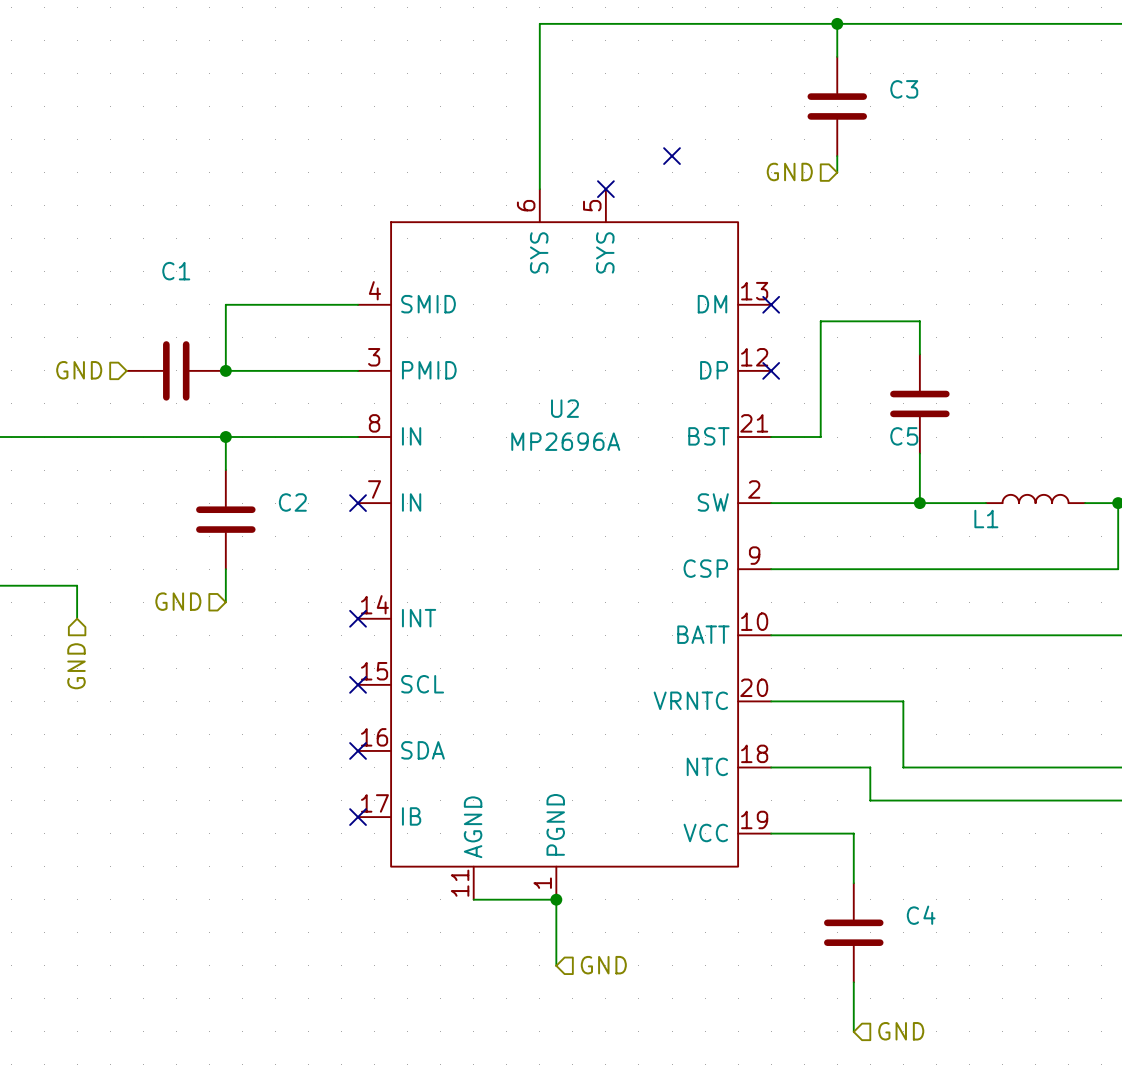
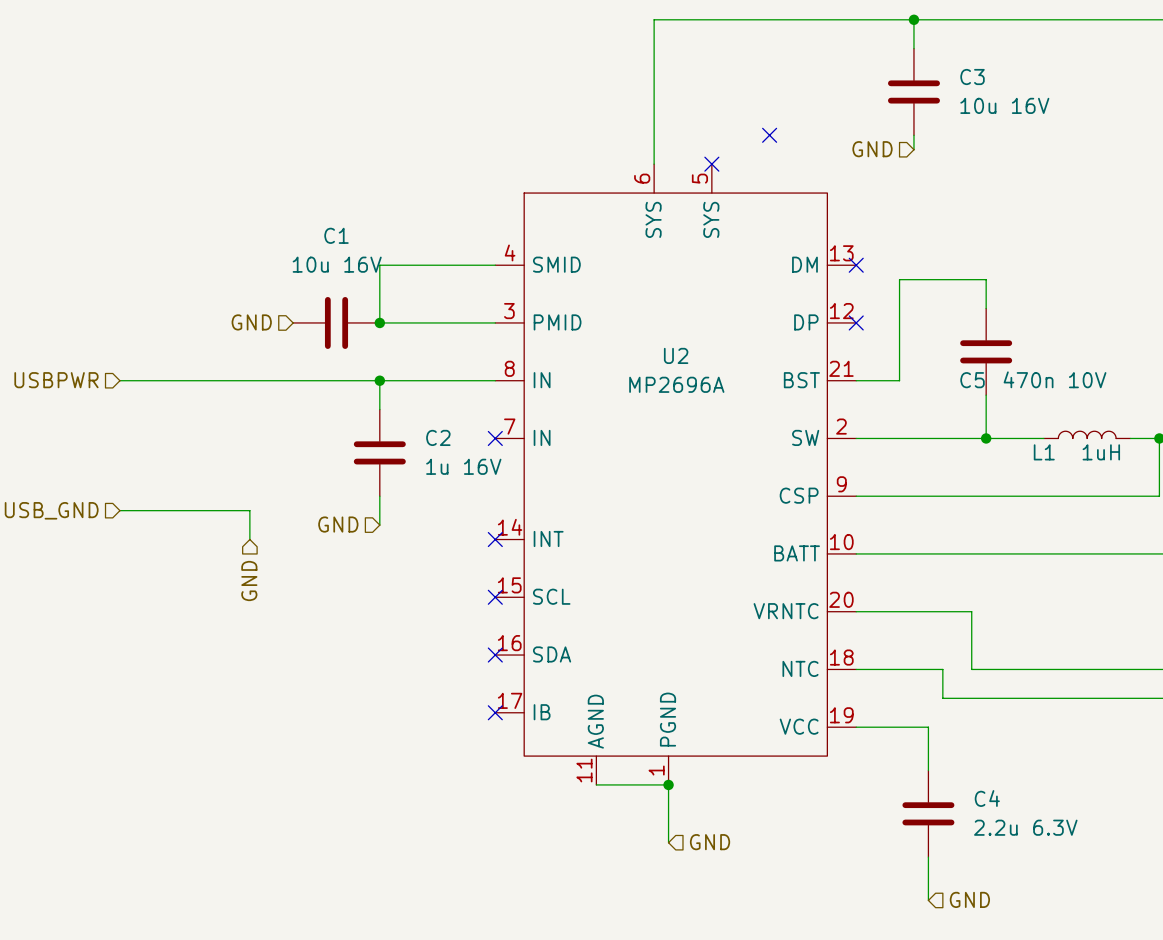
C3 value: none -> 10u 16V (1004, 105)
C1 value: none -> 10u 16V (337, 264)
C5 value: none -> 470n 10V (1055, 379)
L1 value: none -> 1uH (1101, 452)
C2 value: none -> 1u 16V (463, 466)
C4 value: none -> 2.2u 6.3V (1025, 827)

